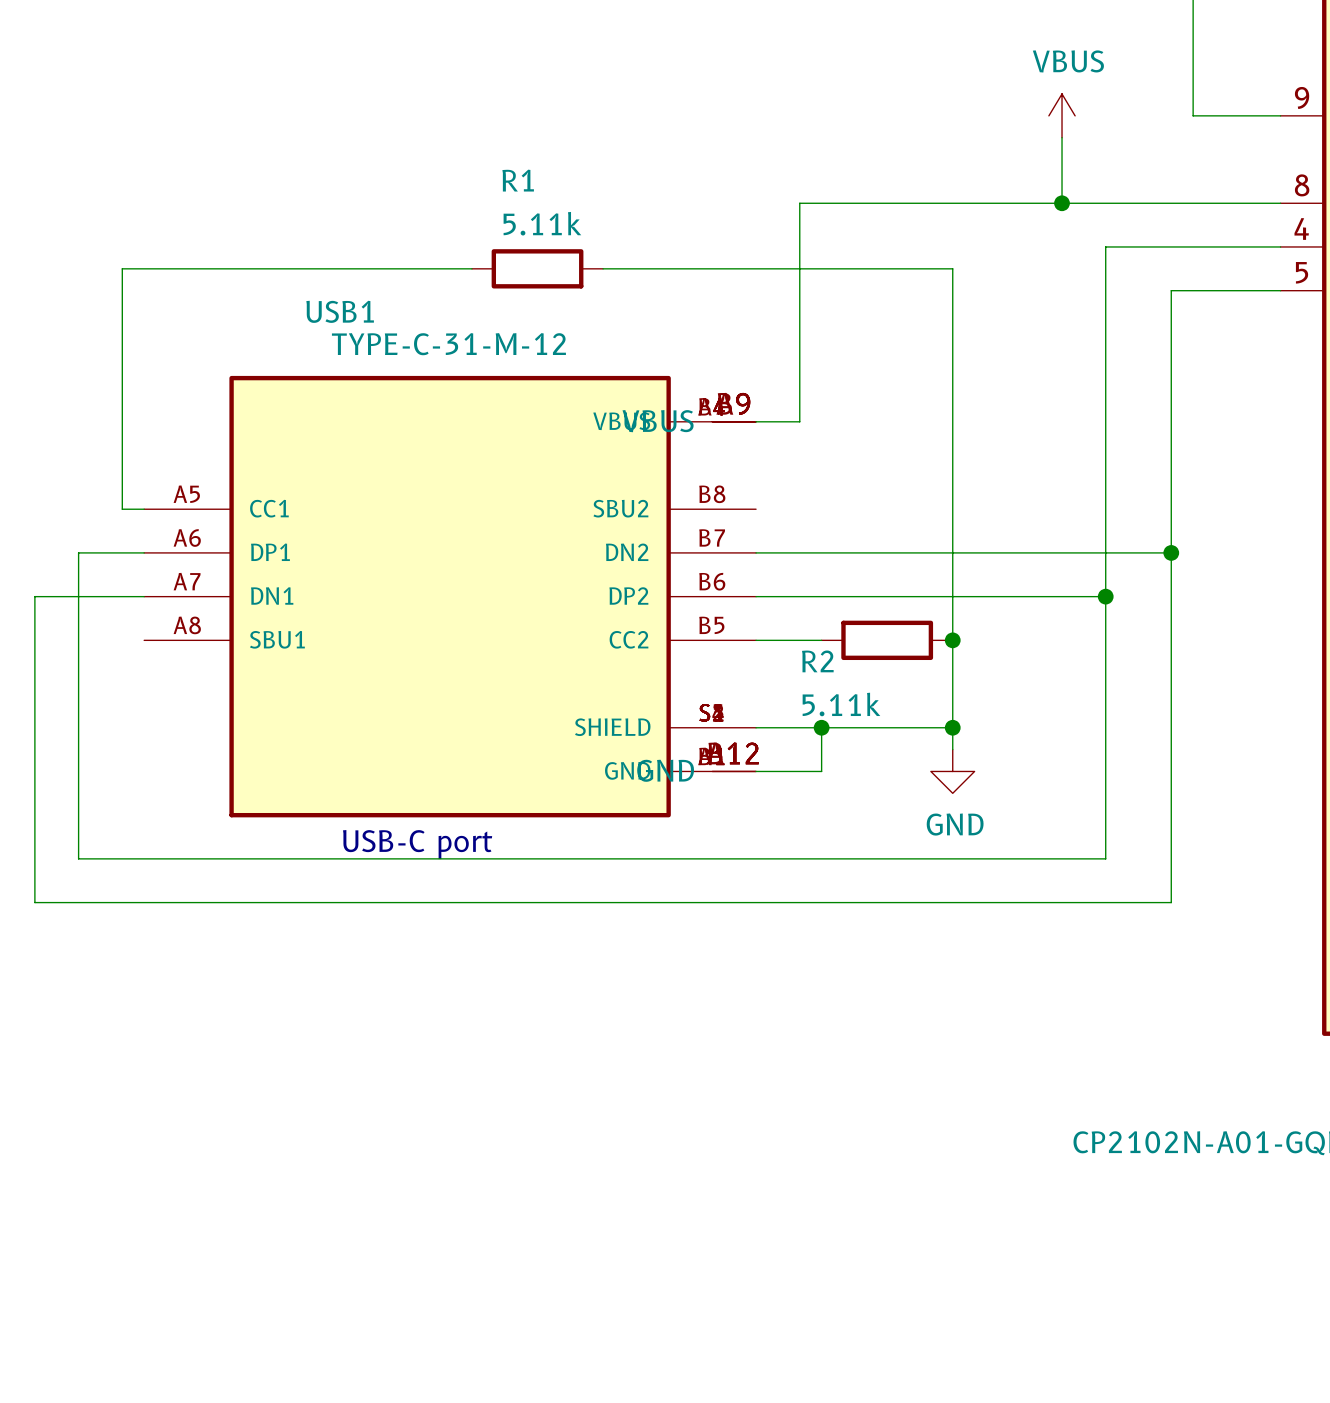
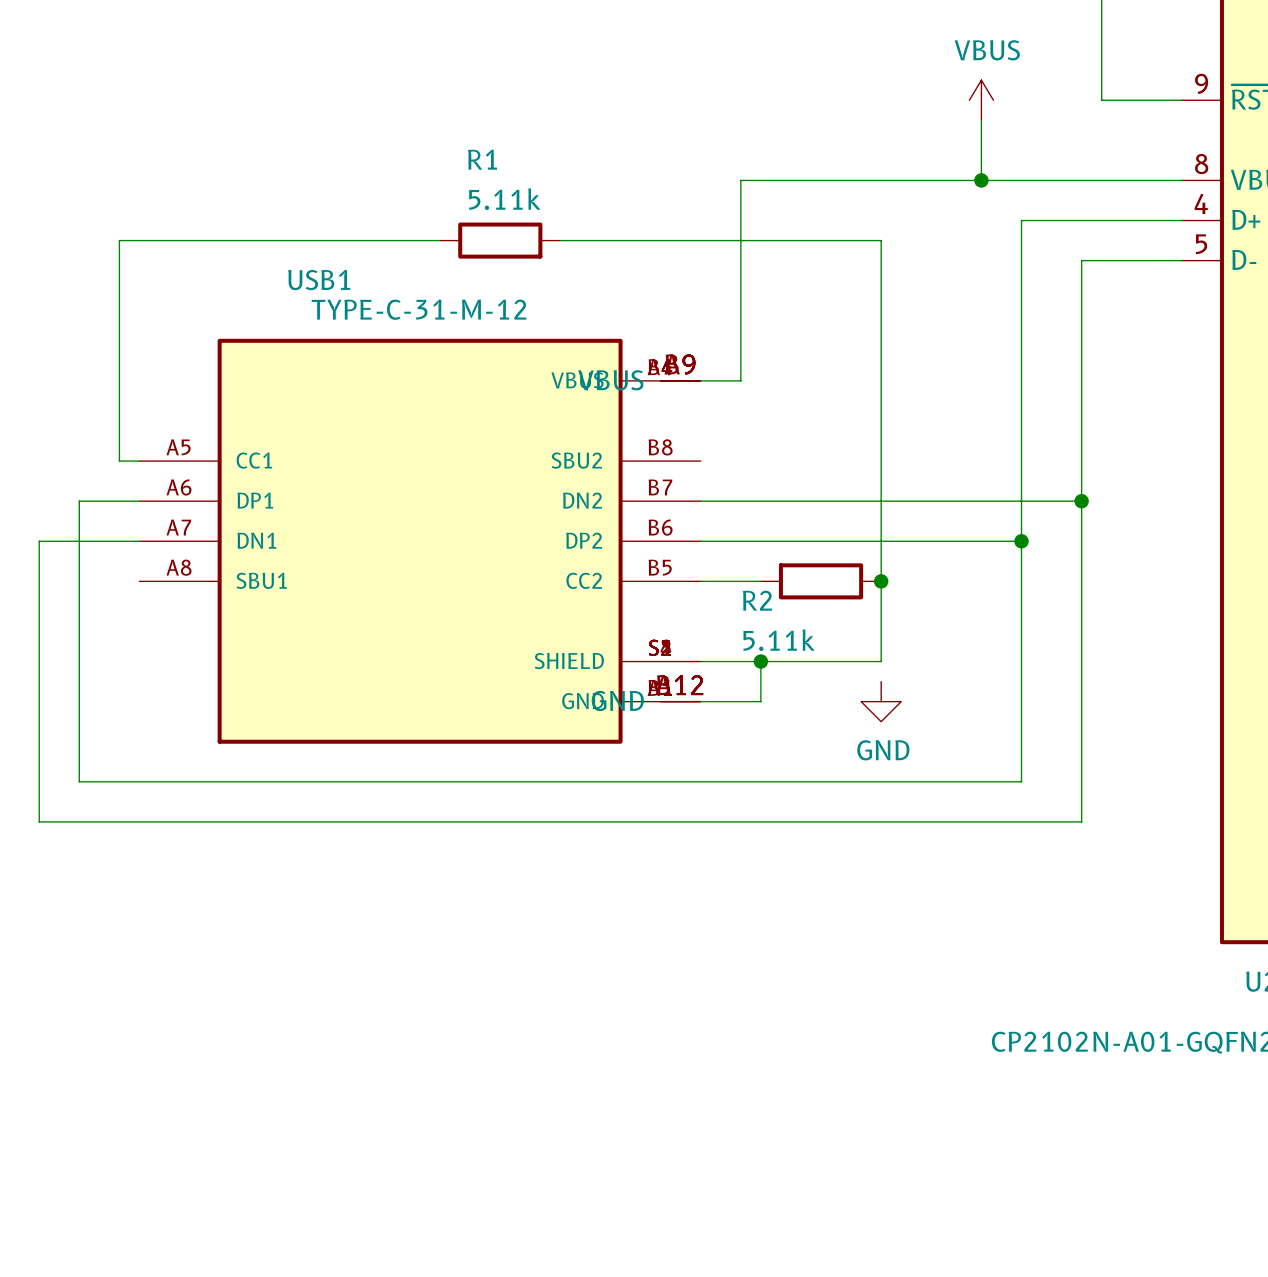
wire: (952, 727) (952, 749) -> none
junction: (952, 727) -> none
text: USB-C port (417, 844) -> none

